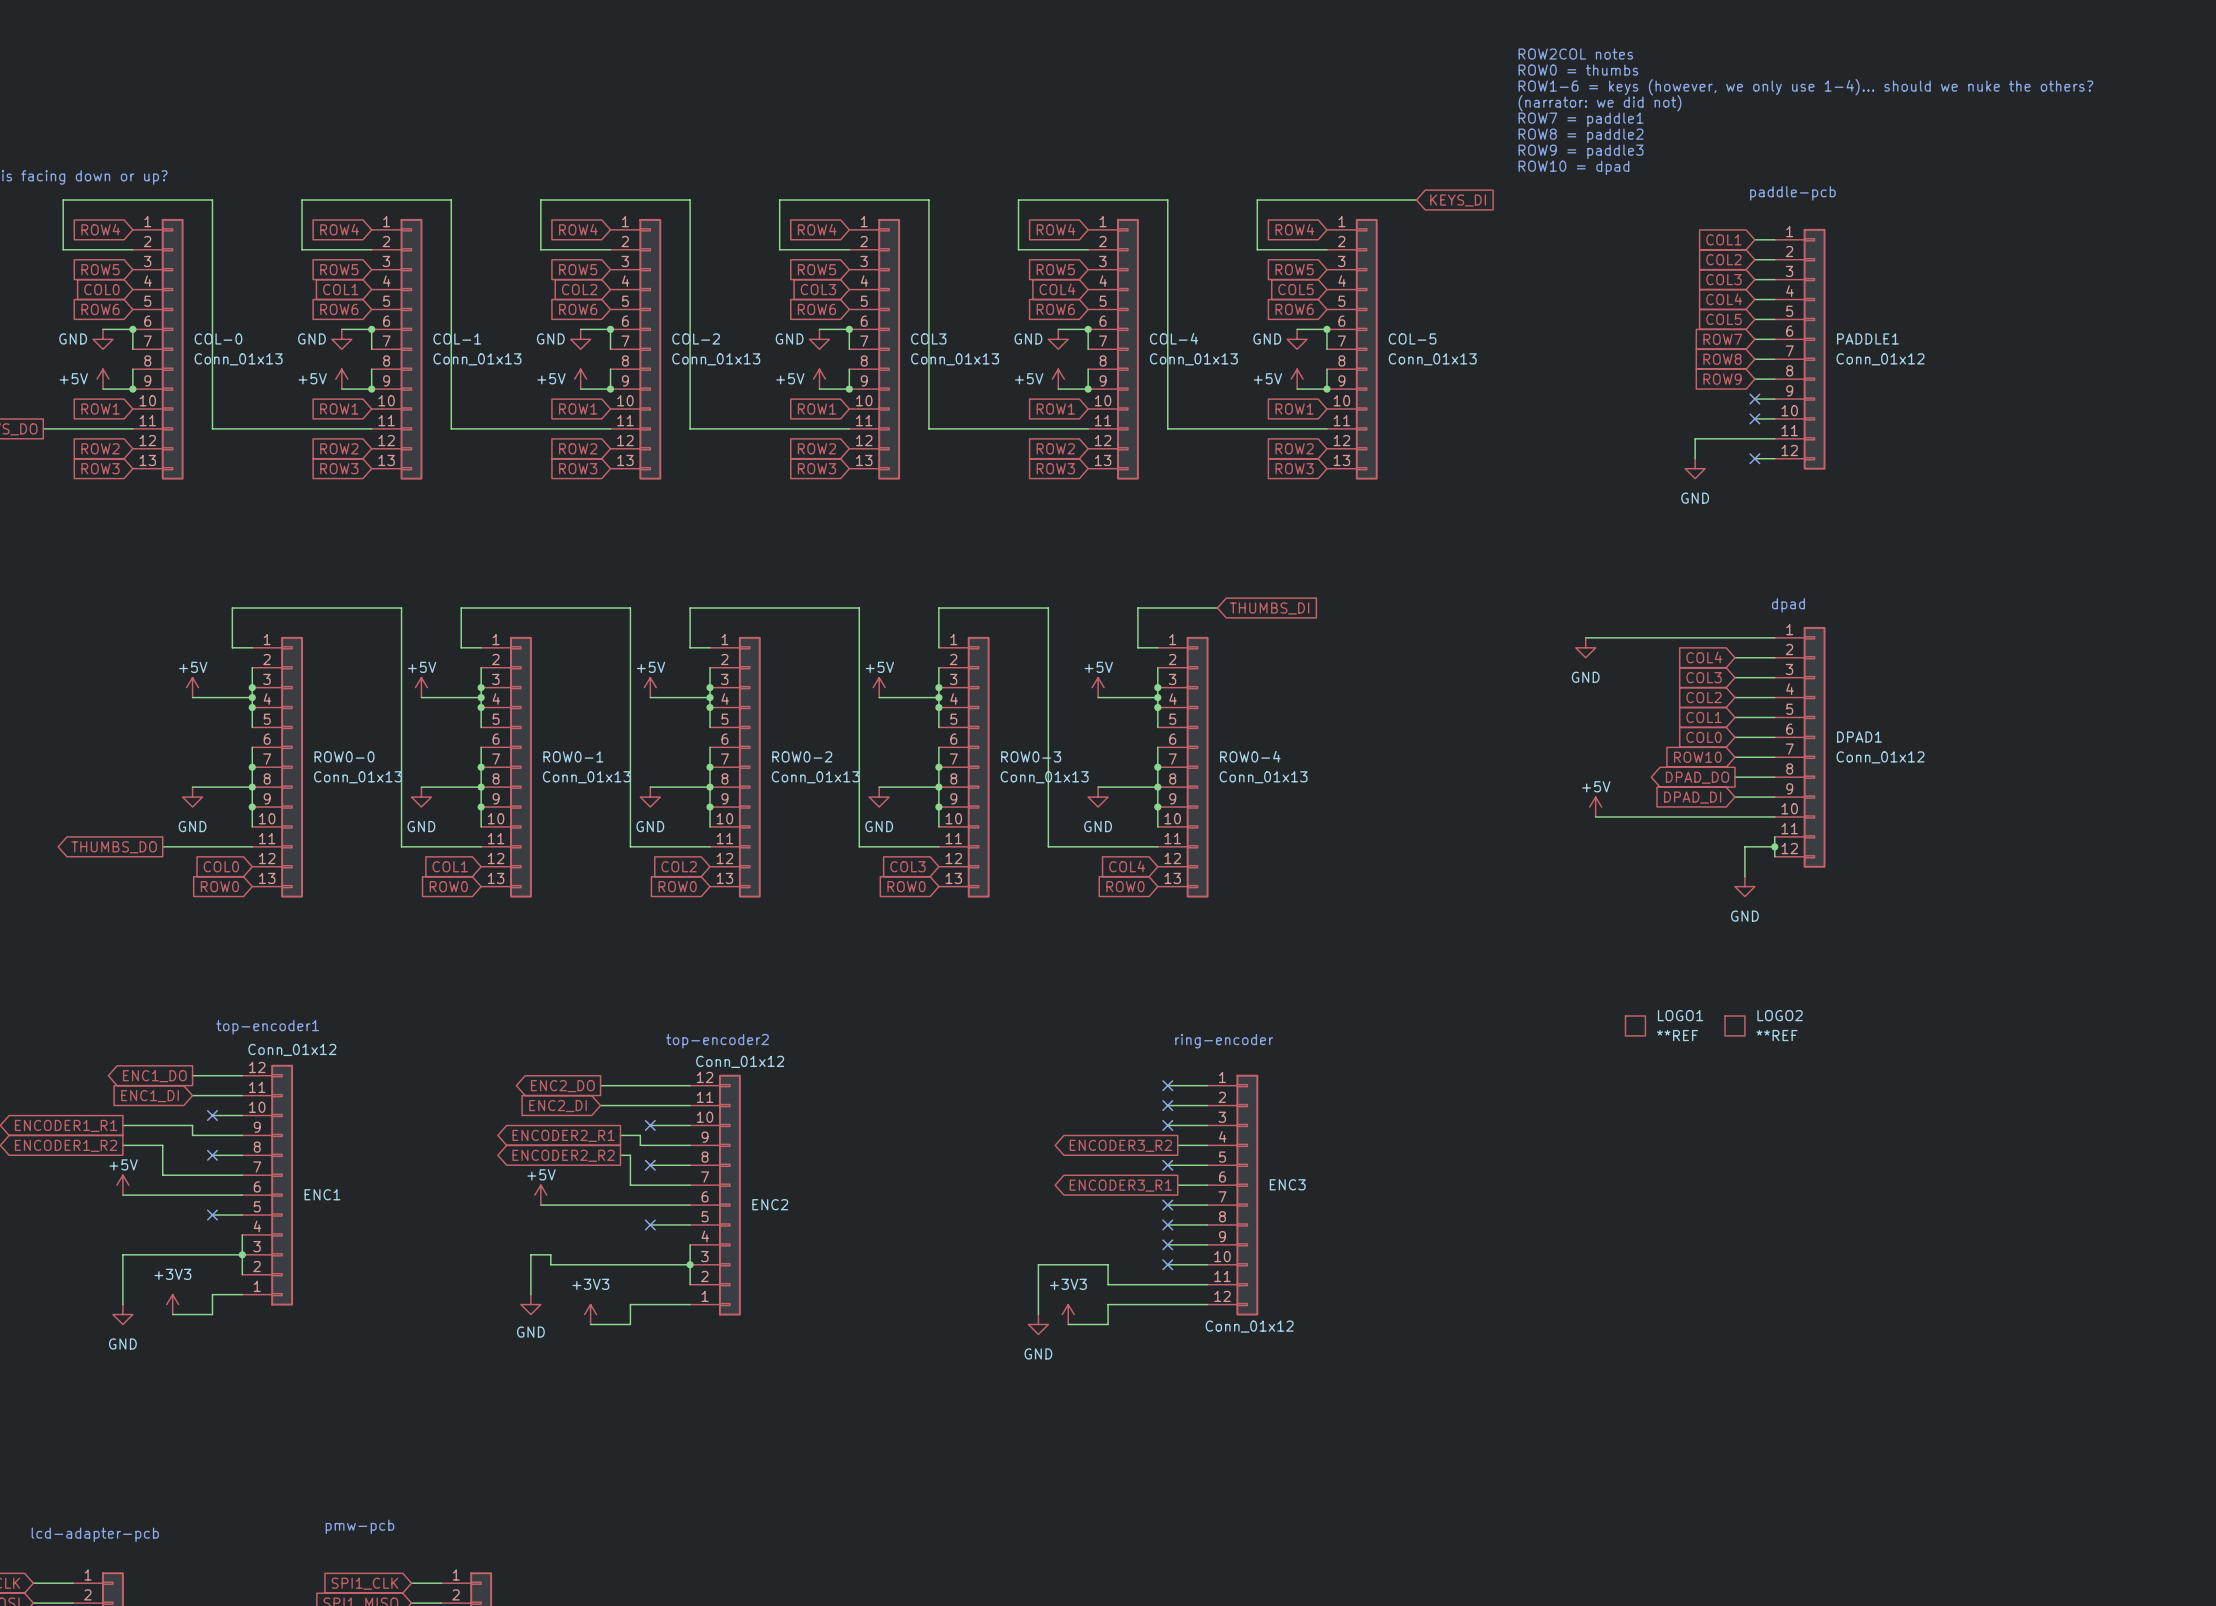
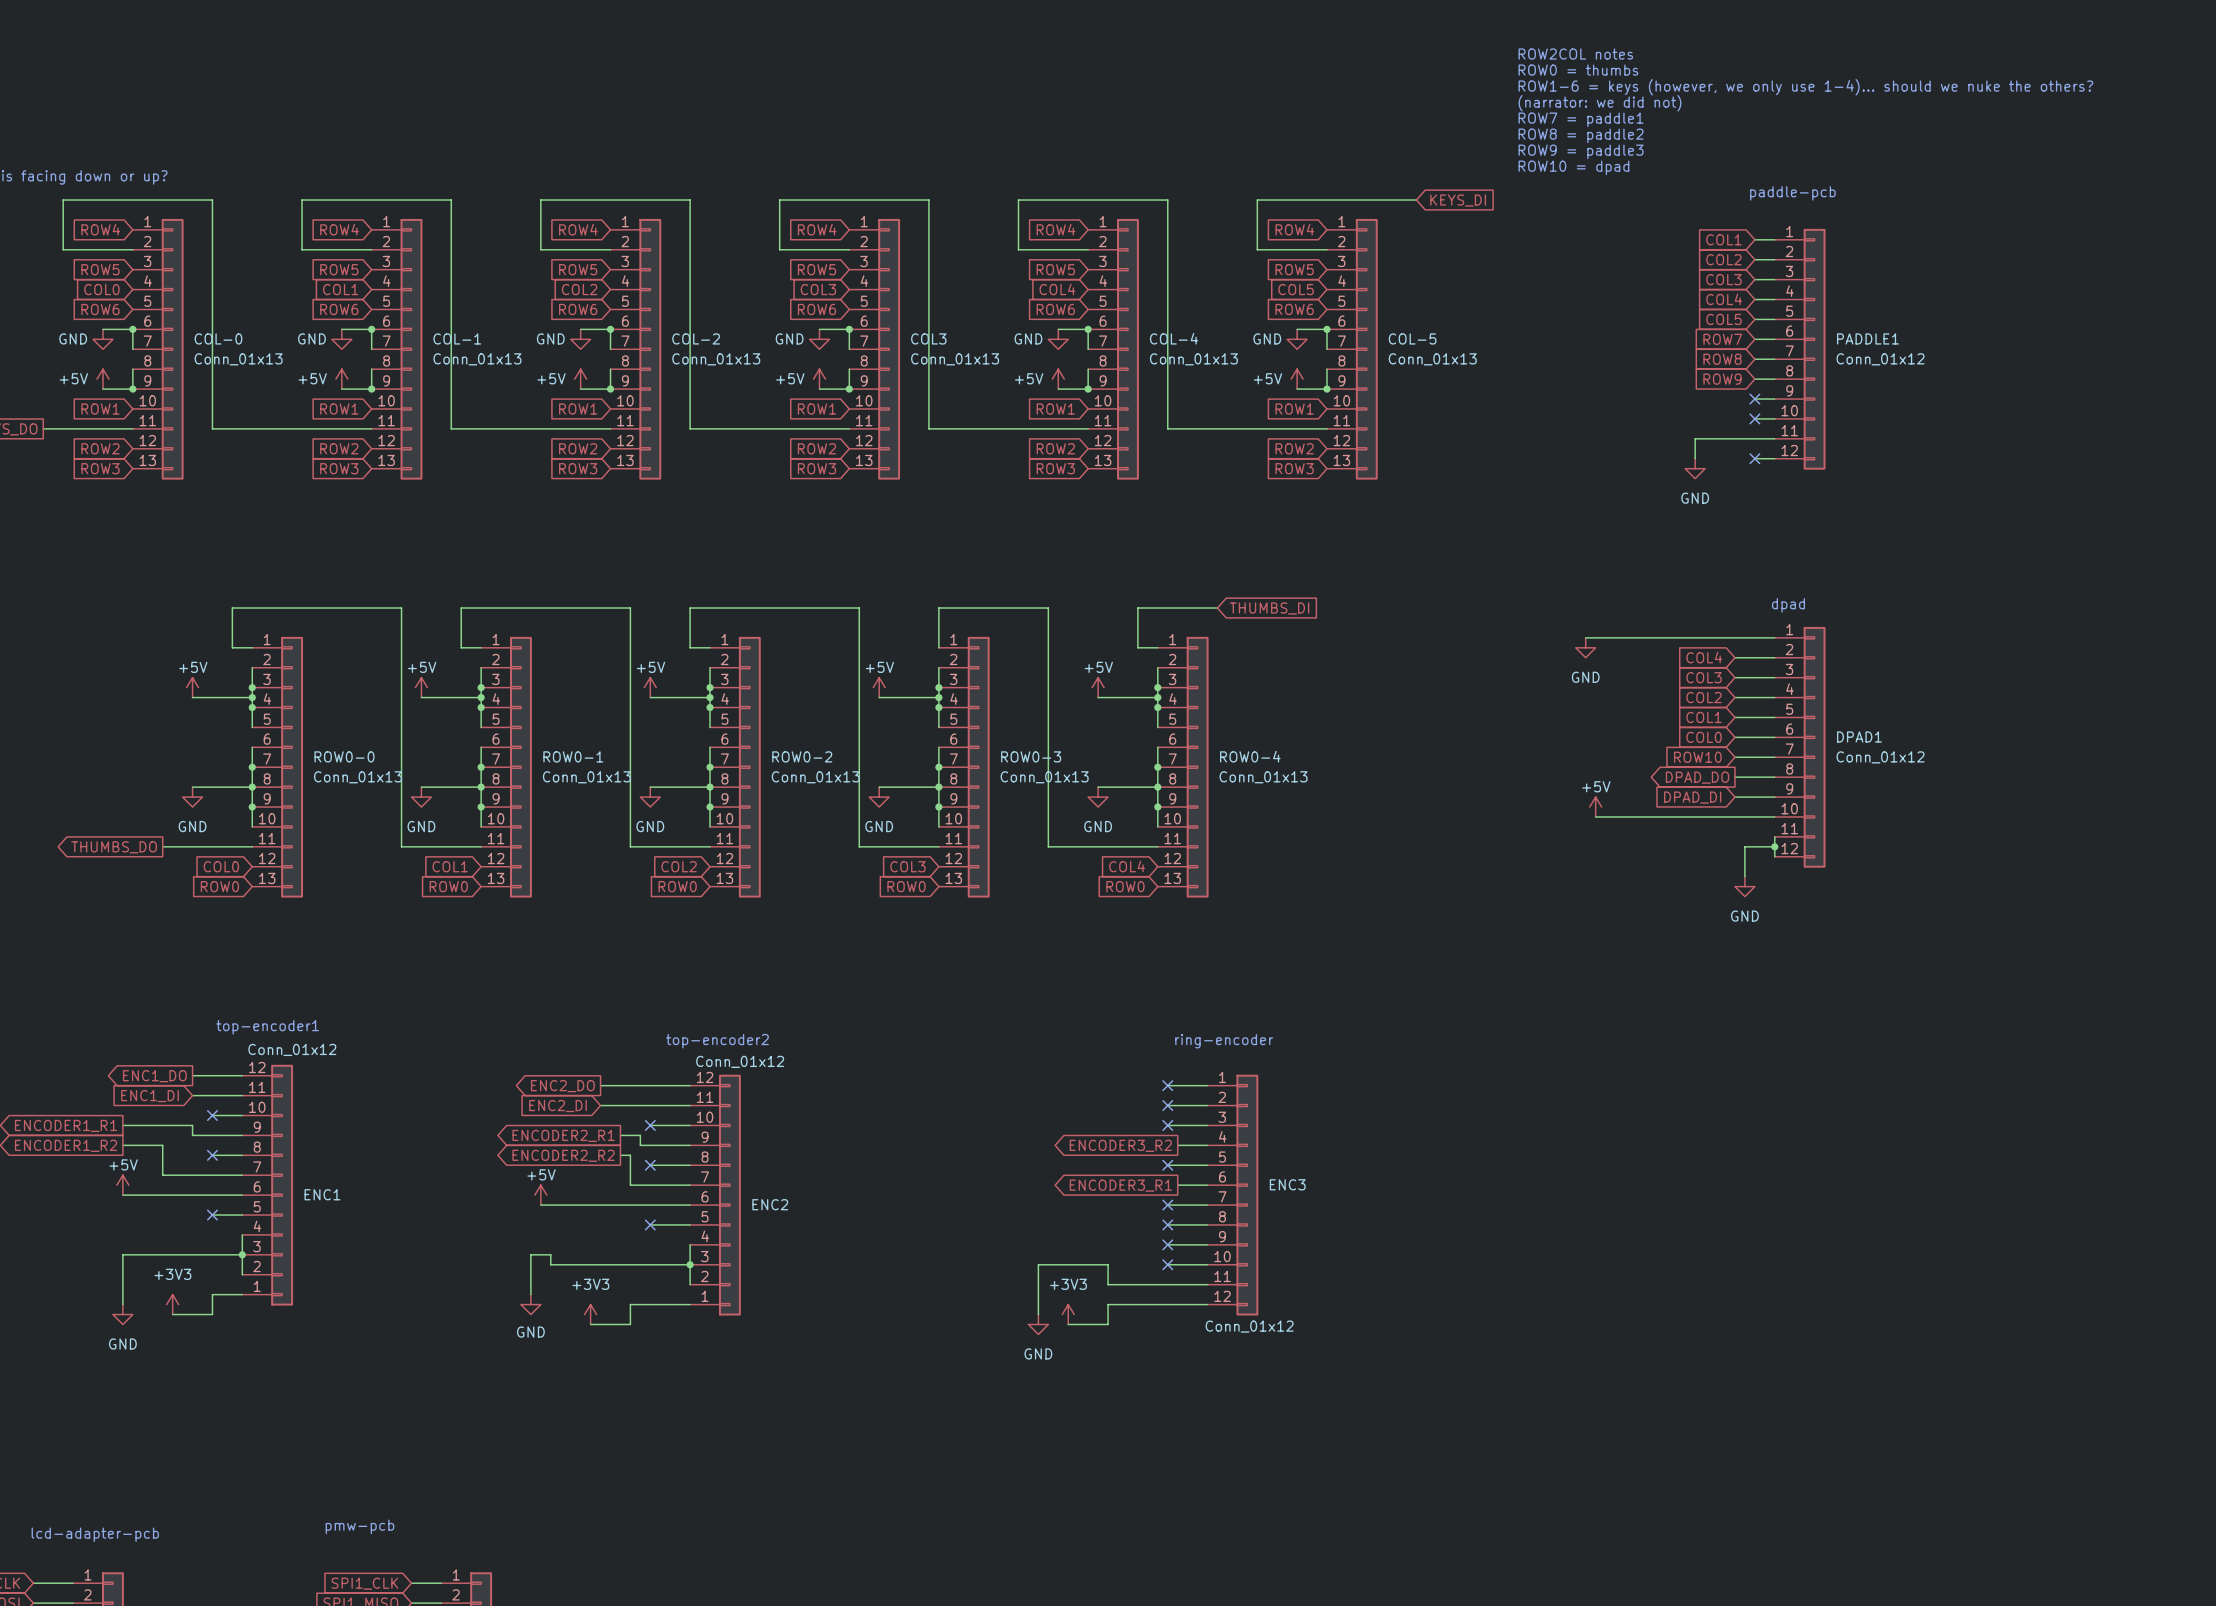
LOGO1: **REF (1635, 1025) -> none
LOGO2: **REF (1734, 1025) -> none

